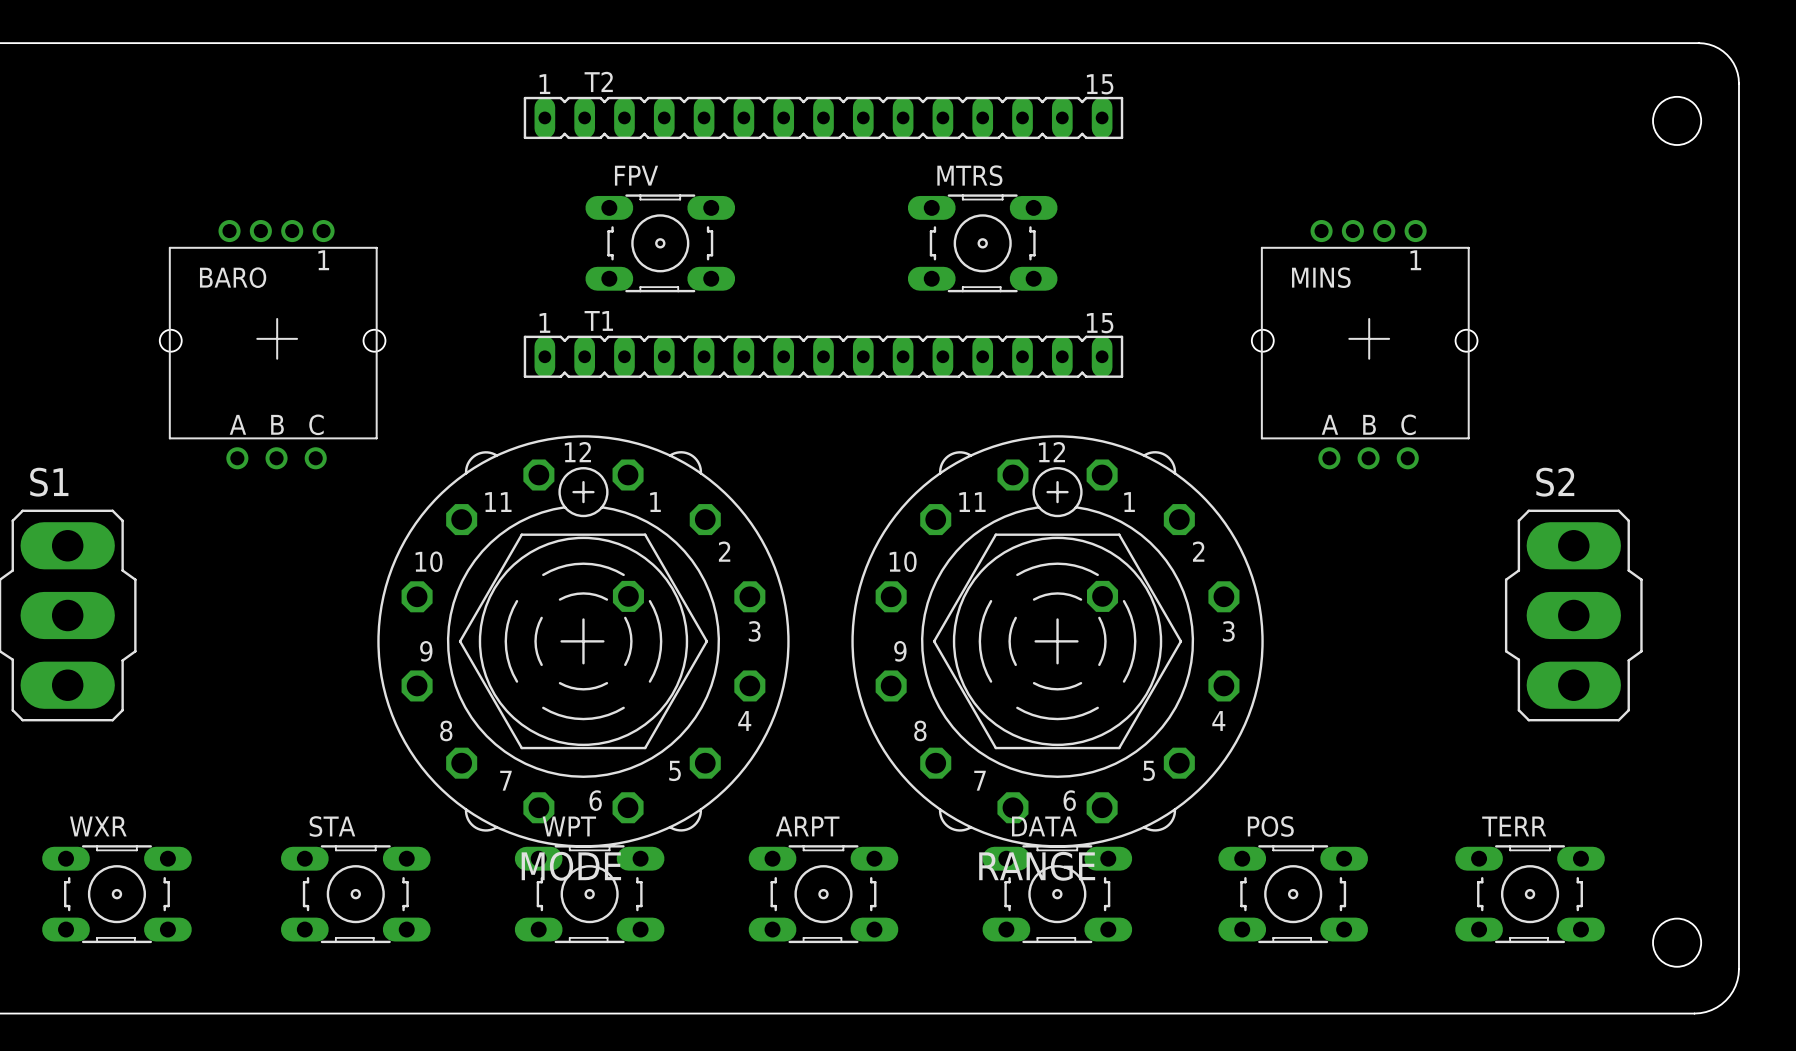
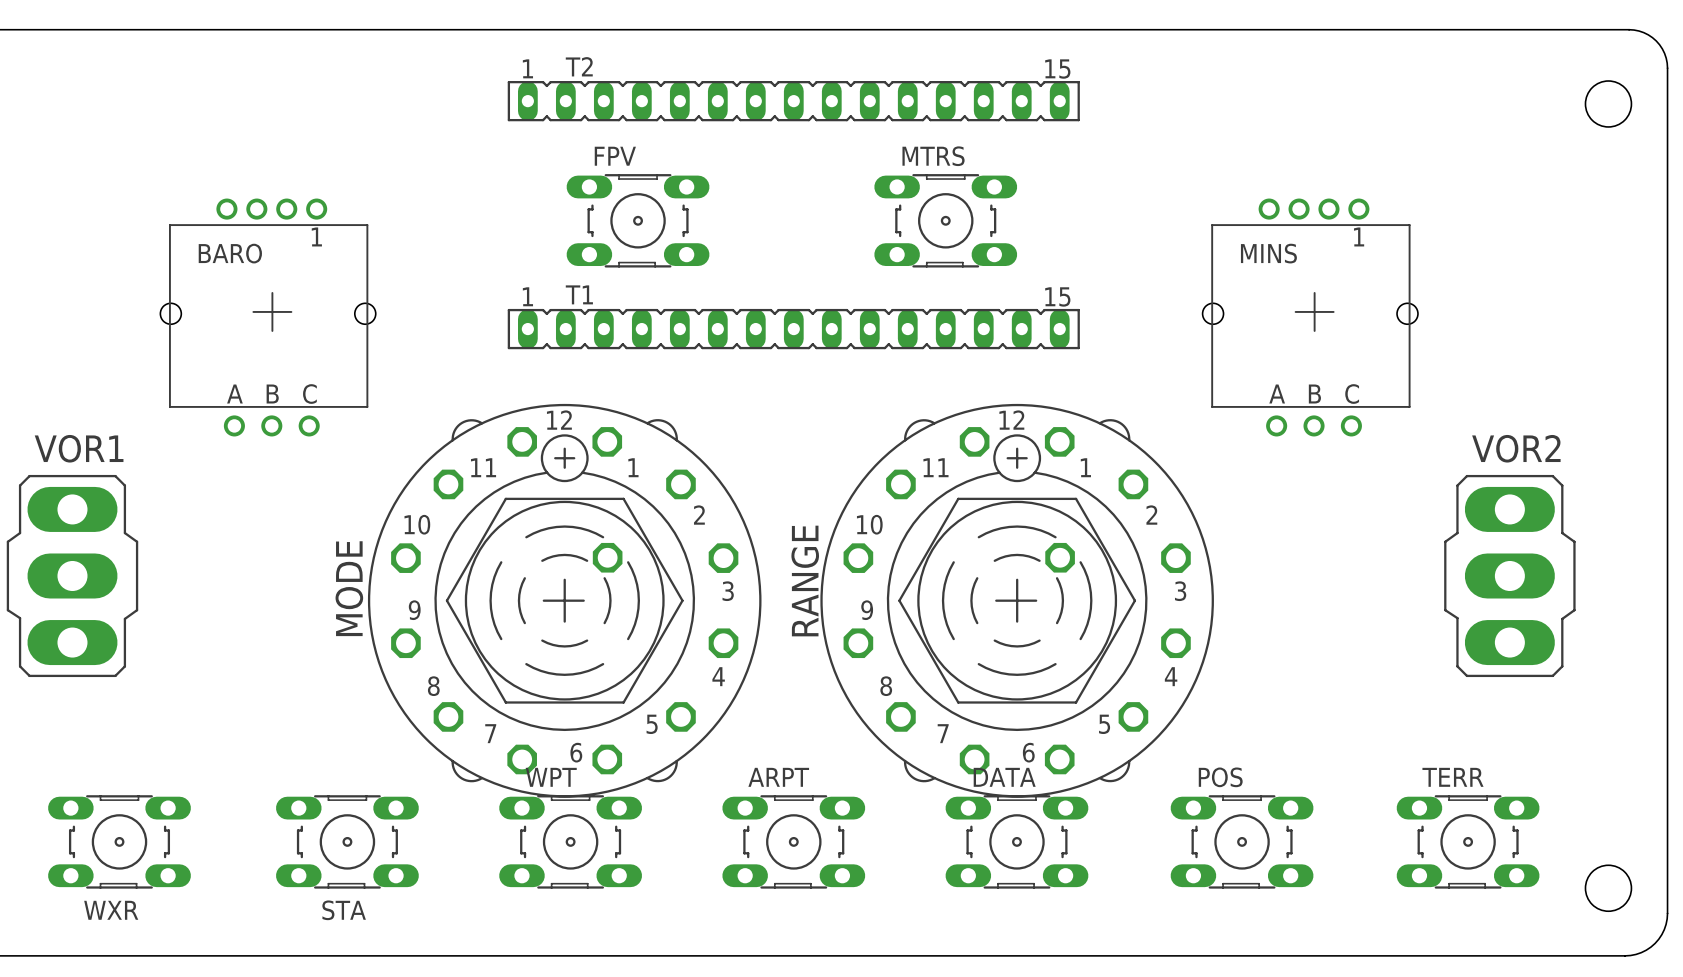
S1 name: S1 (49, 482) -> VOR1 (79, 448)
S2 name: S2 (1555, 482) -> VOR2 (1516, 448)
WXR name position: WXR (98, 826) -> WXR (111, 910)
STA name position: STA (332, 826) -> STA (344, 910)
MODE name rotation: 0° (571, 866) -> 90° counterclockwise (349, 588)
MODE name position: MODE (571, 866) -> MODE (349, 588)
RANGE name rotation: 0° (1037, 866) -> 90° counterclockwise (805, 581)
RANGE name position: RANGE (1037, 866) -> RANGE (805, 581)

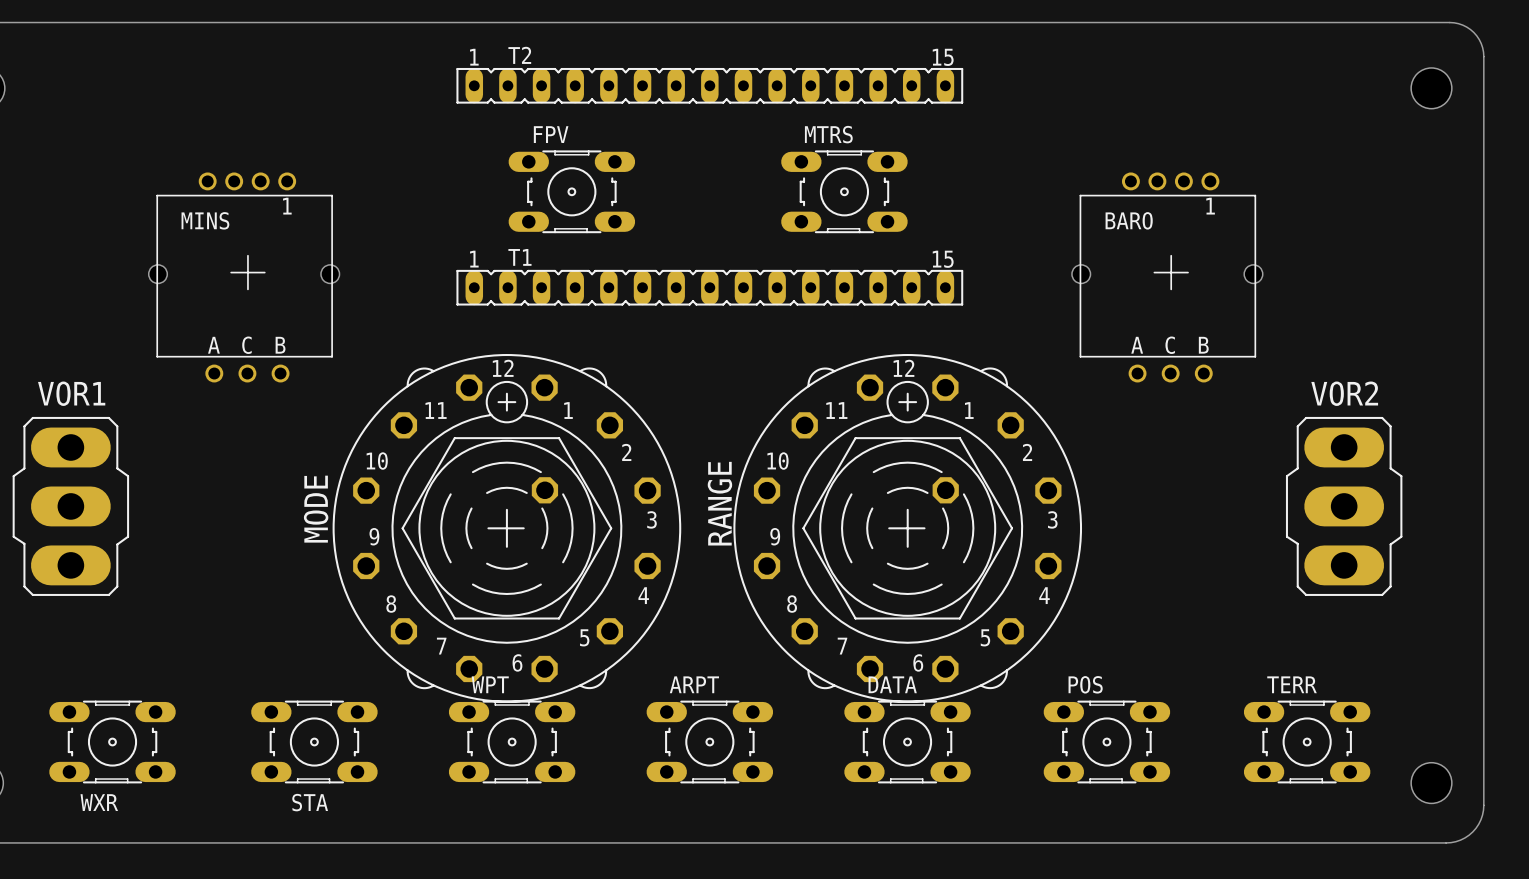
BARO: (268, 317) -> none
MINS: none -> (244, 277)
MINS: (1310, 317) -> none
BARO: none -> (1167, 277)

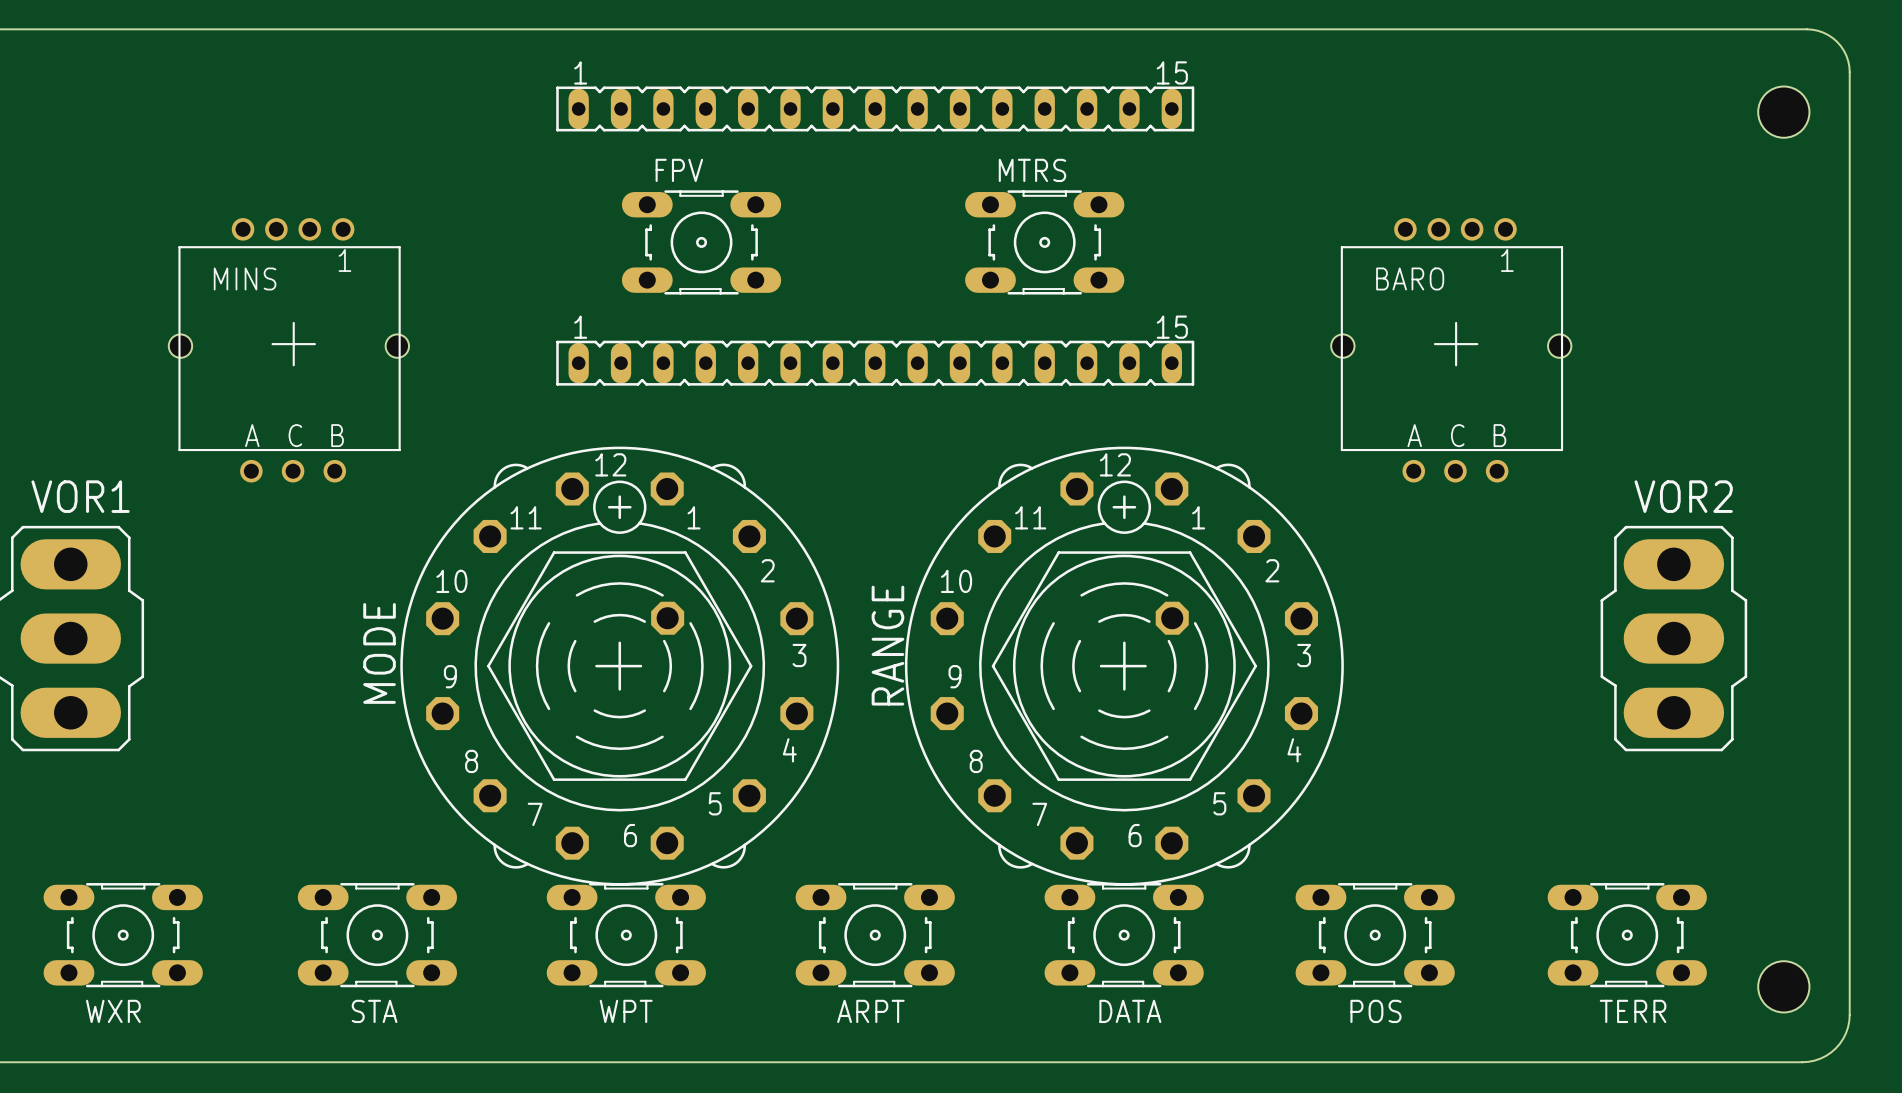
T2: (709, 85) -> none
part: none -> (875, 108)
T1: (709, 287) -> none
part: none -> (875, 363)
WPT name position: WPT (490, 684) -> WPT (626, 1011)
ARPT name position: ARPT (694, 684) -> ARPT (870, 1011)
DATA name position: DATA (892, 684) -> DATA (1130, 1011)
POS name position: POS (1085, 684) -> POS (1375, 1011)
TERR name position: TERR (1292, 684) -> TERR (1633, 1011)

